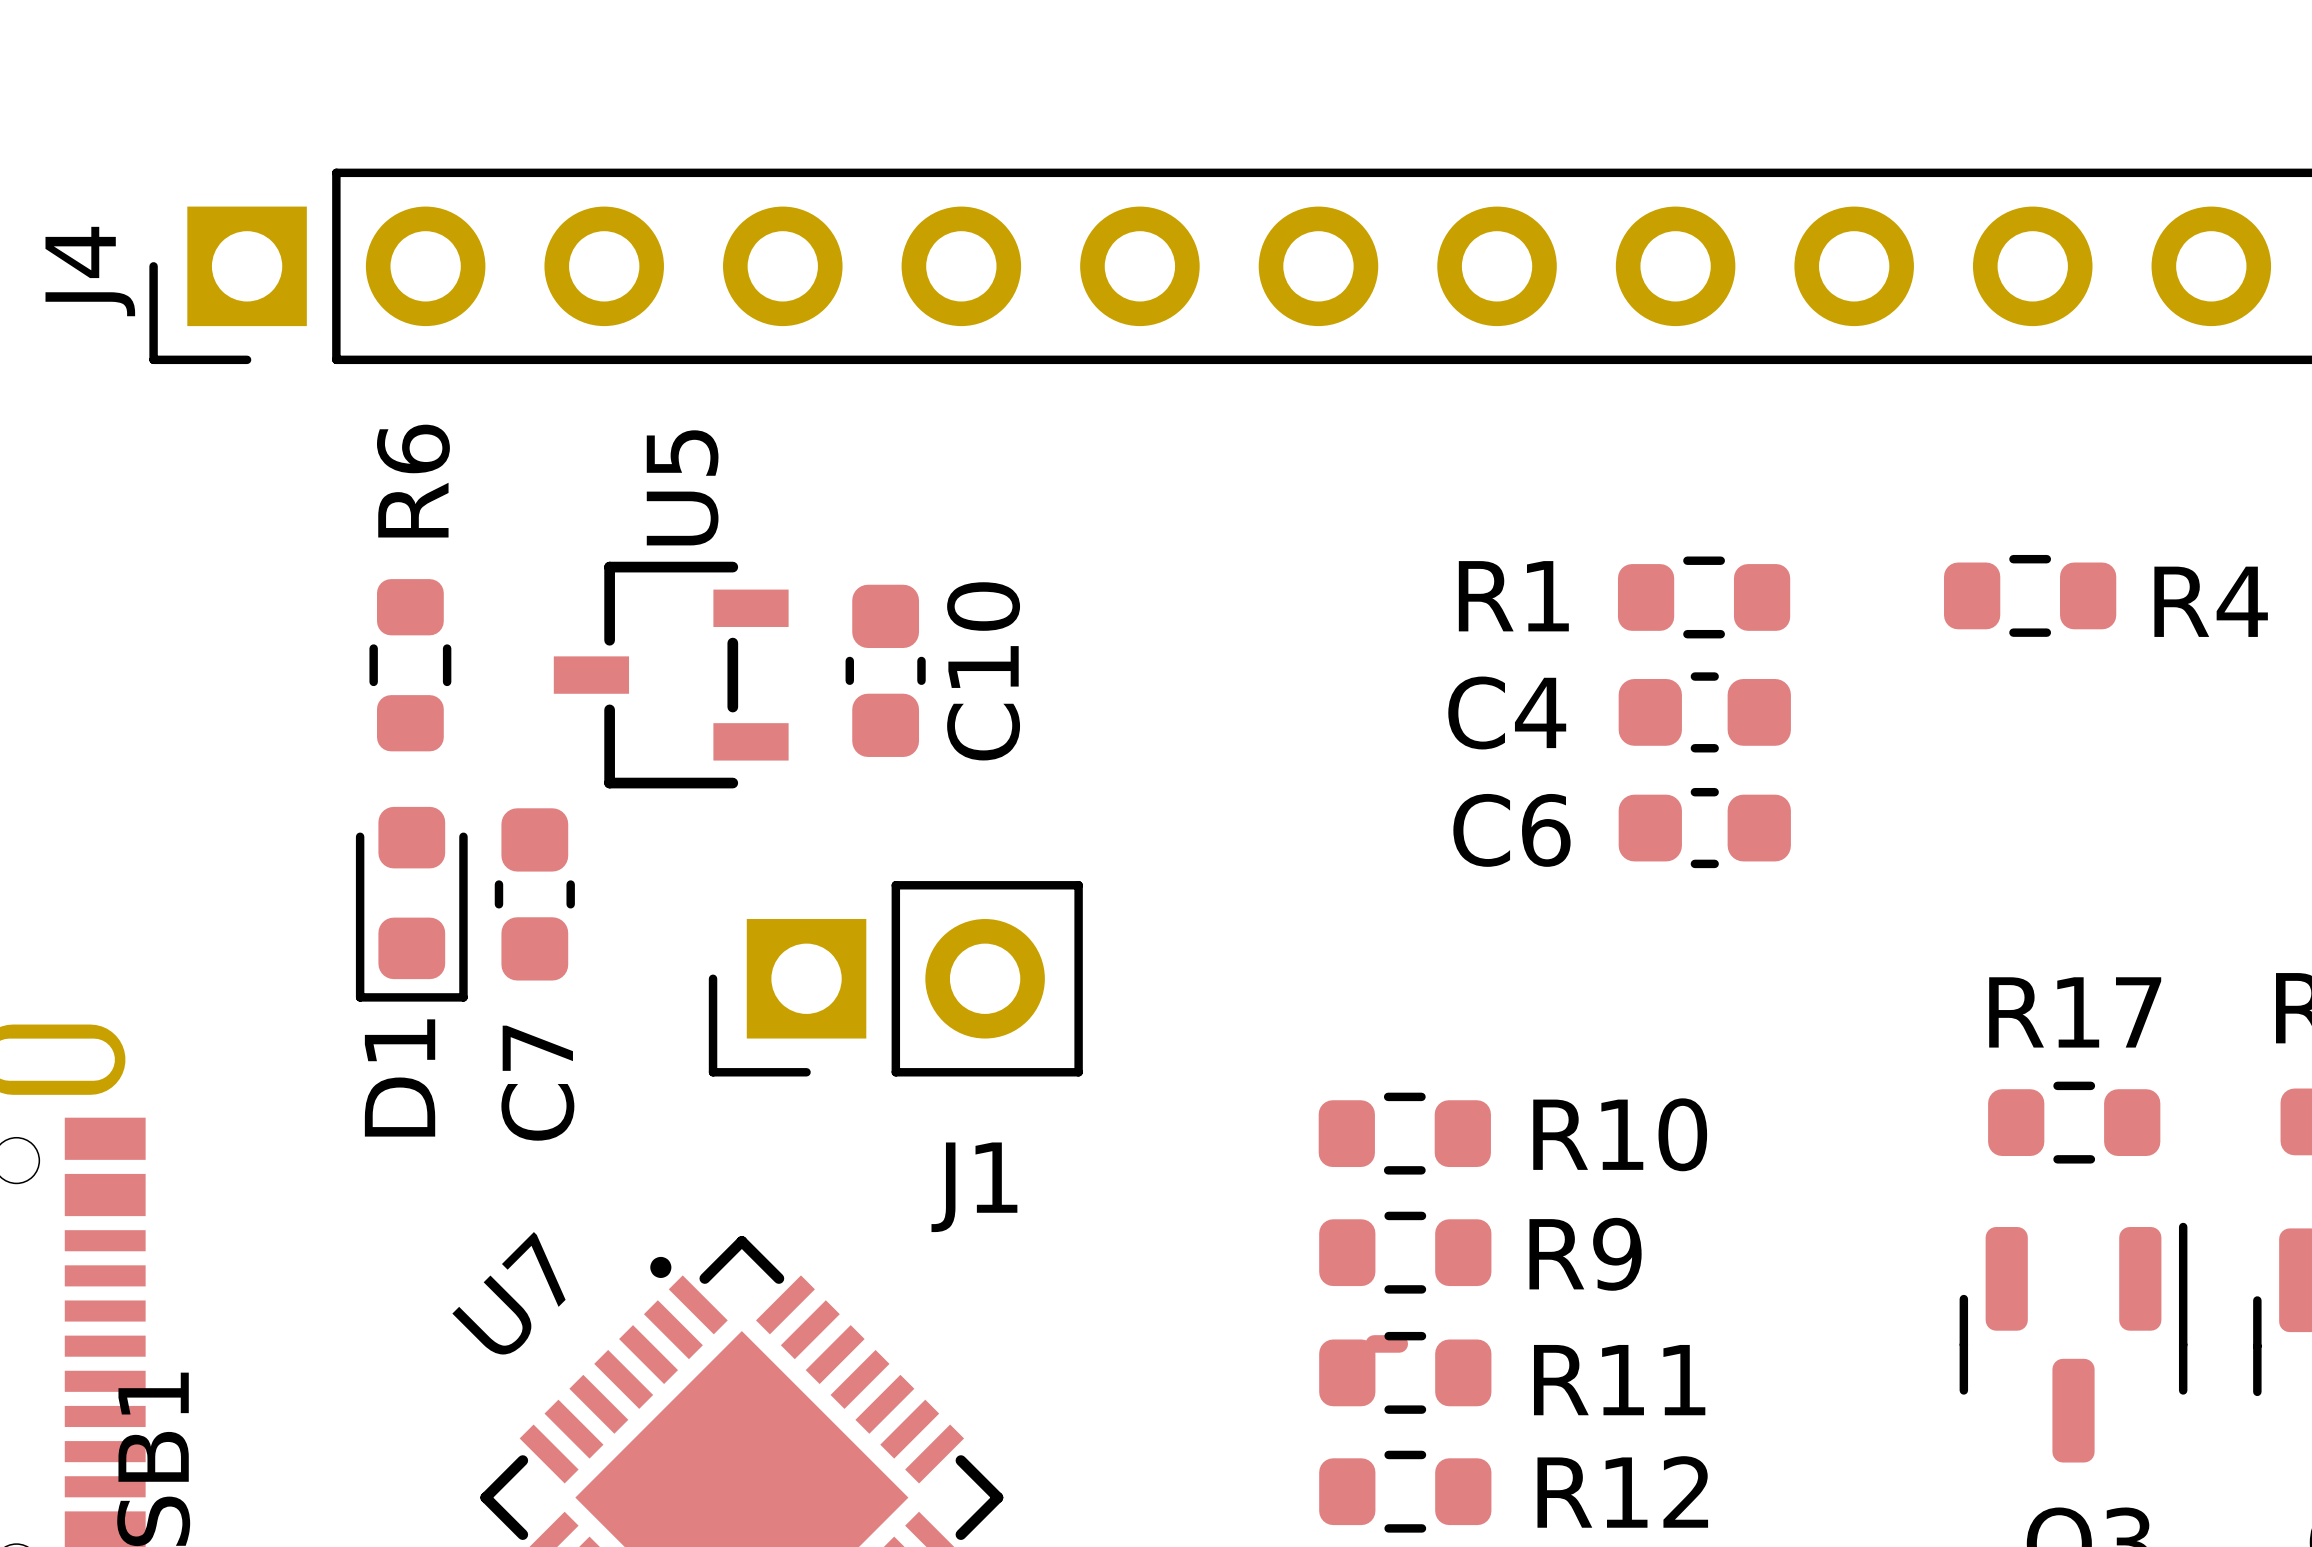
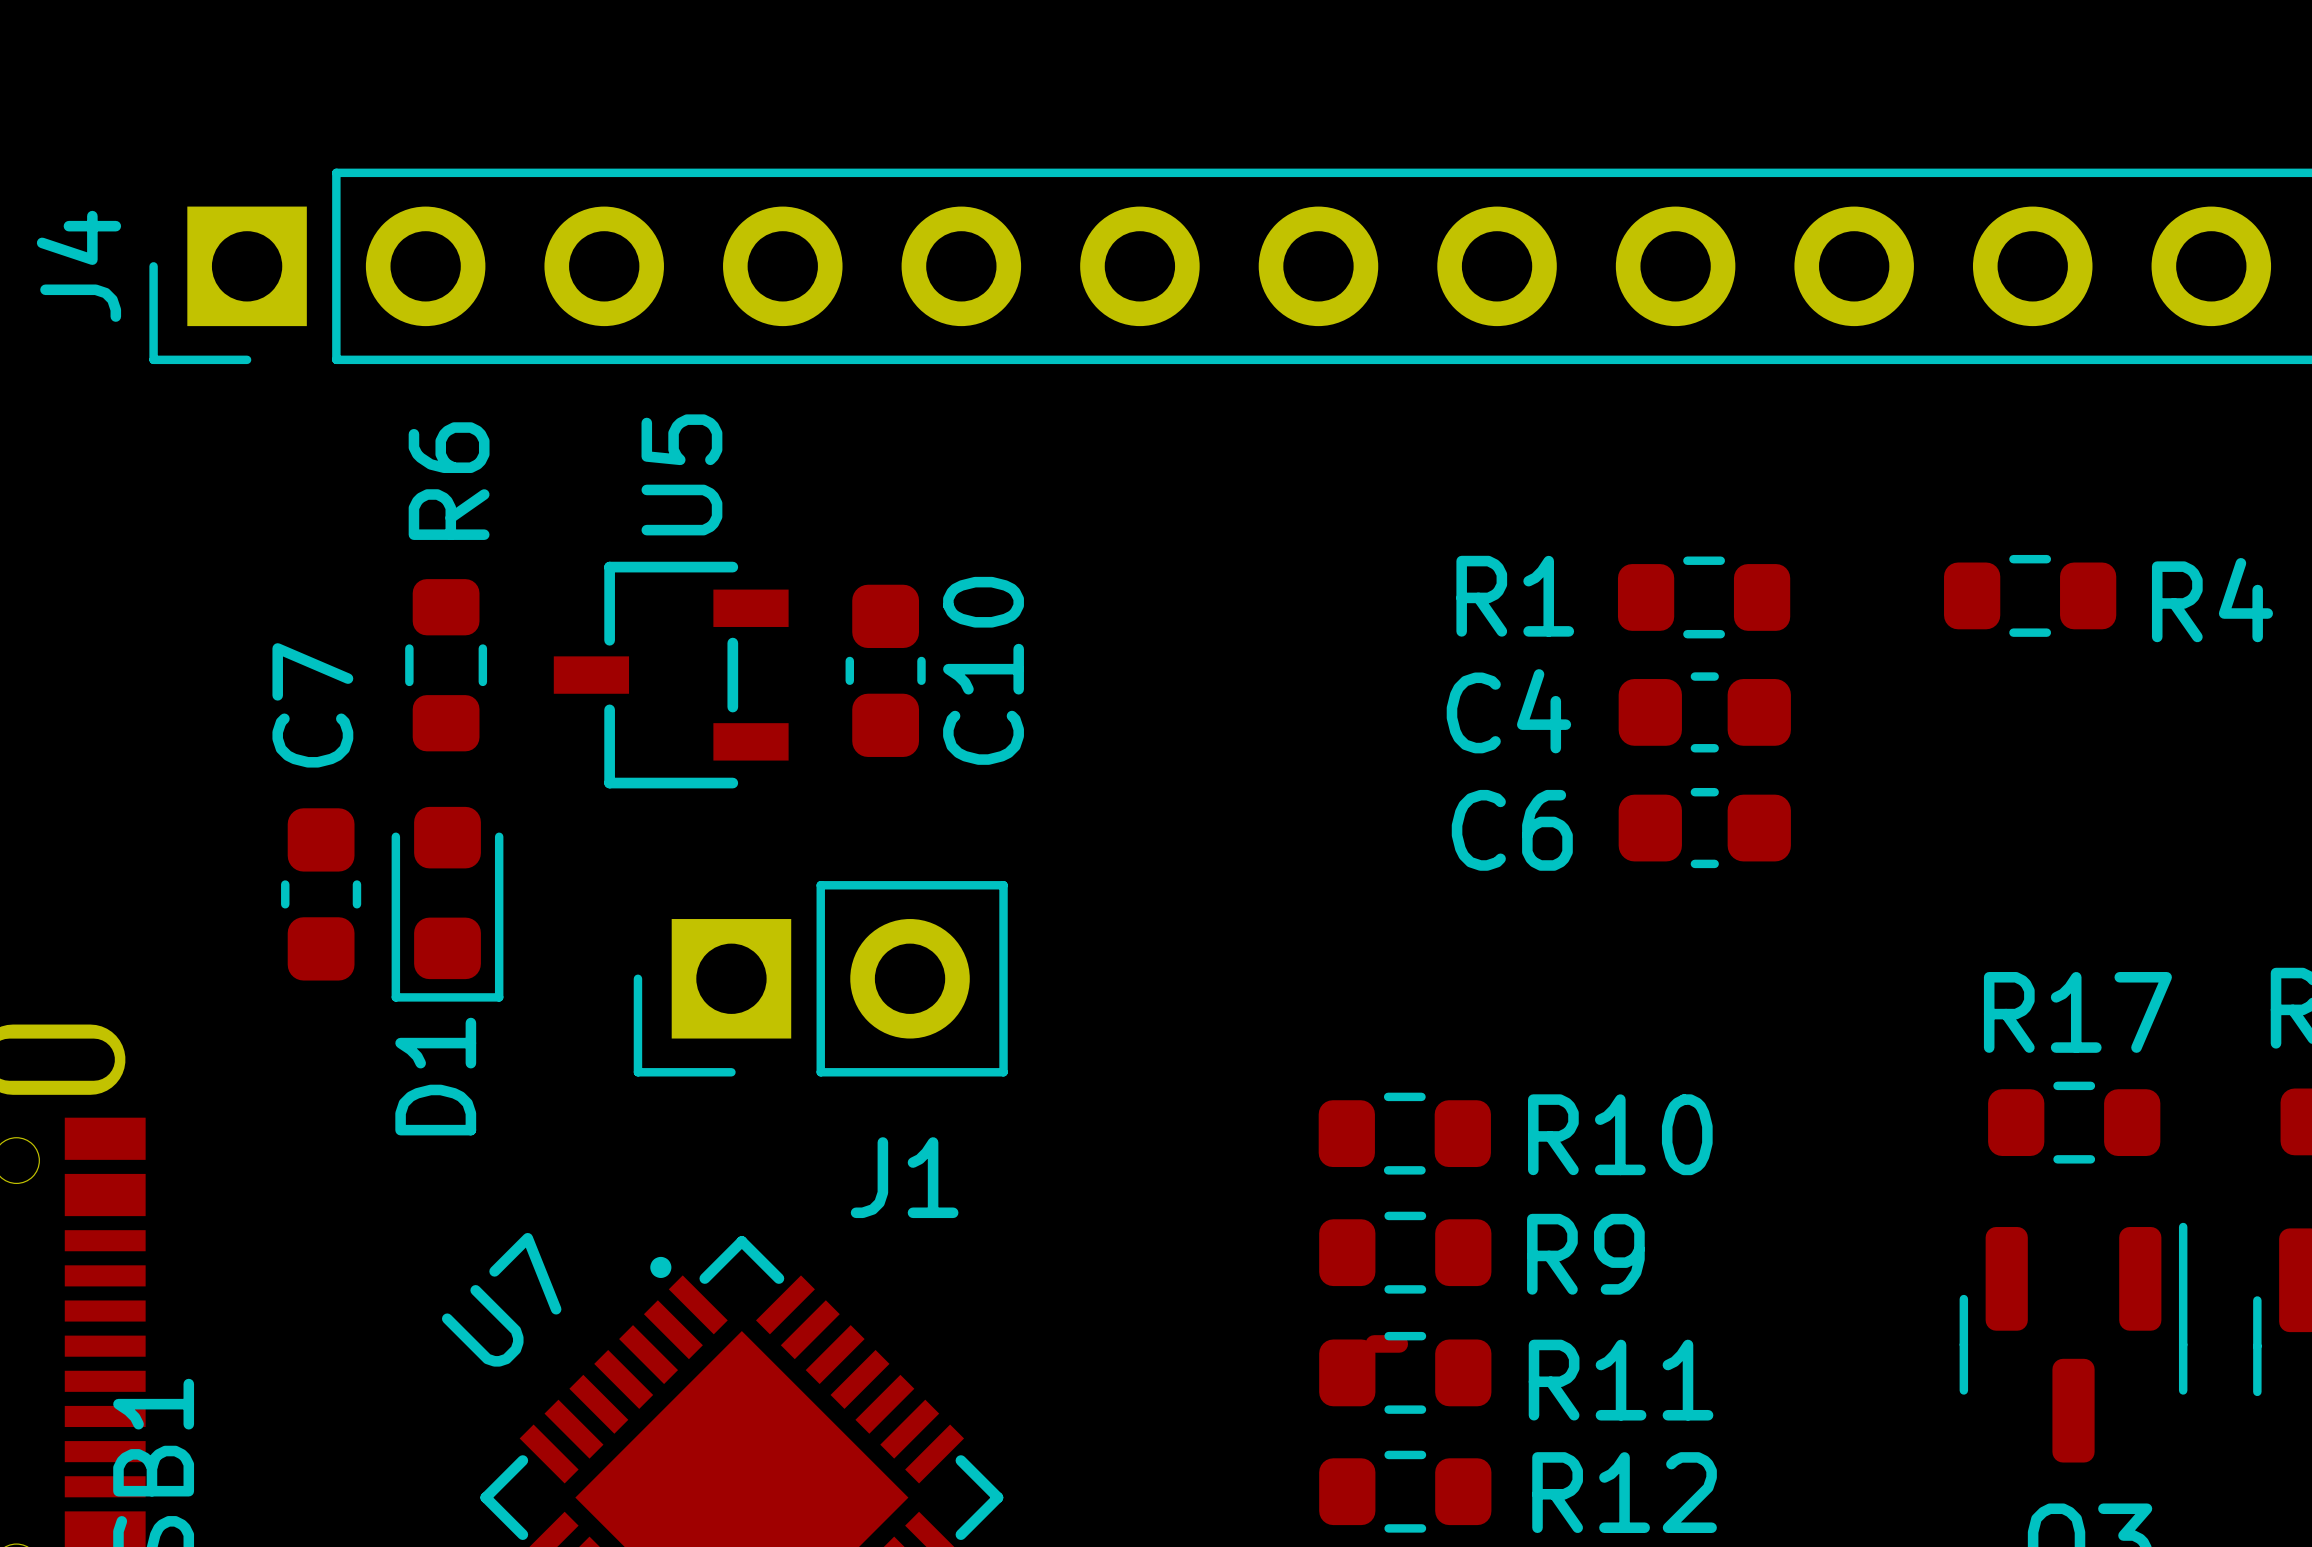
R6 position: (410, 665) -> (446, 665)
C7 position: (534, 894) -> (321, 894)
D1 position: (411, 904) -> (447, 904)
J1 position: (895, 978) -> (820, 978)
C7 name position: C7 (537, 1083) -> C7 (312, 705)

